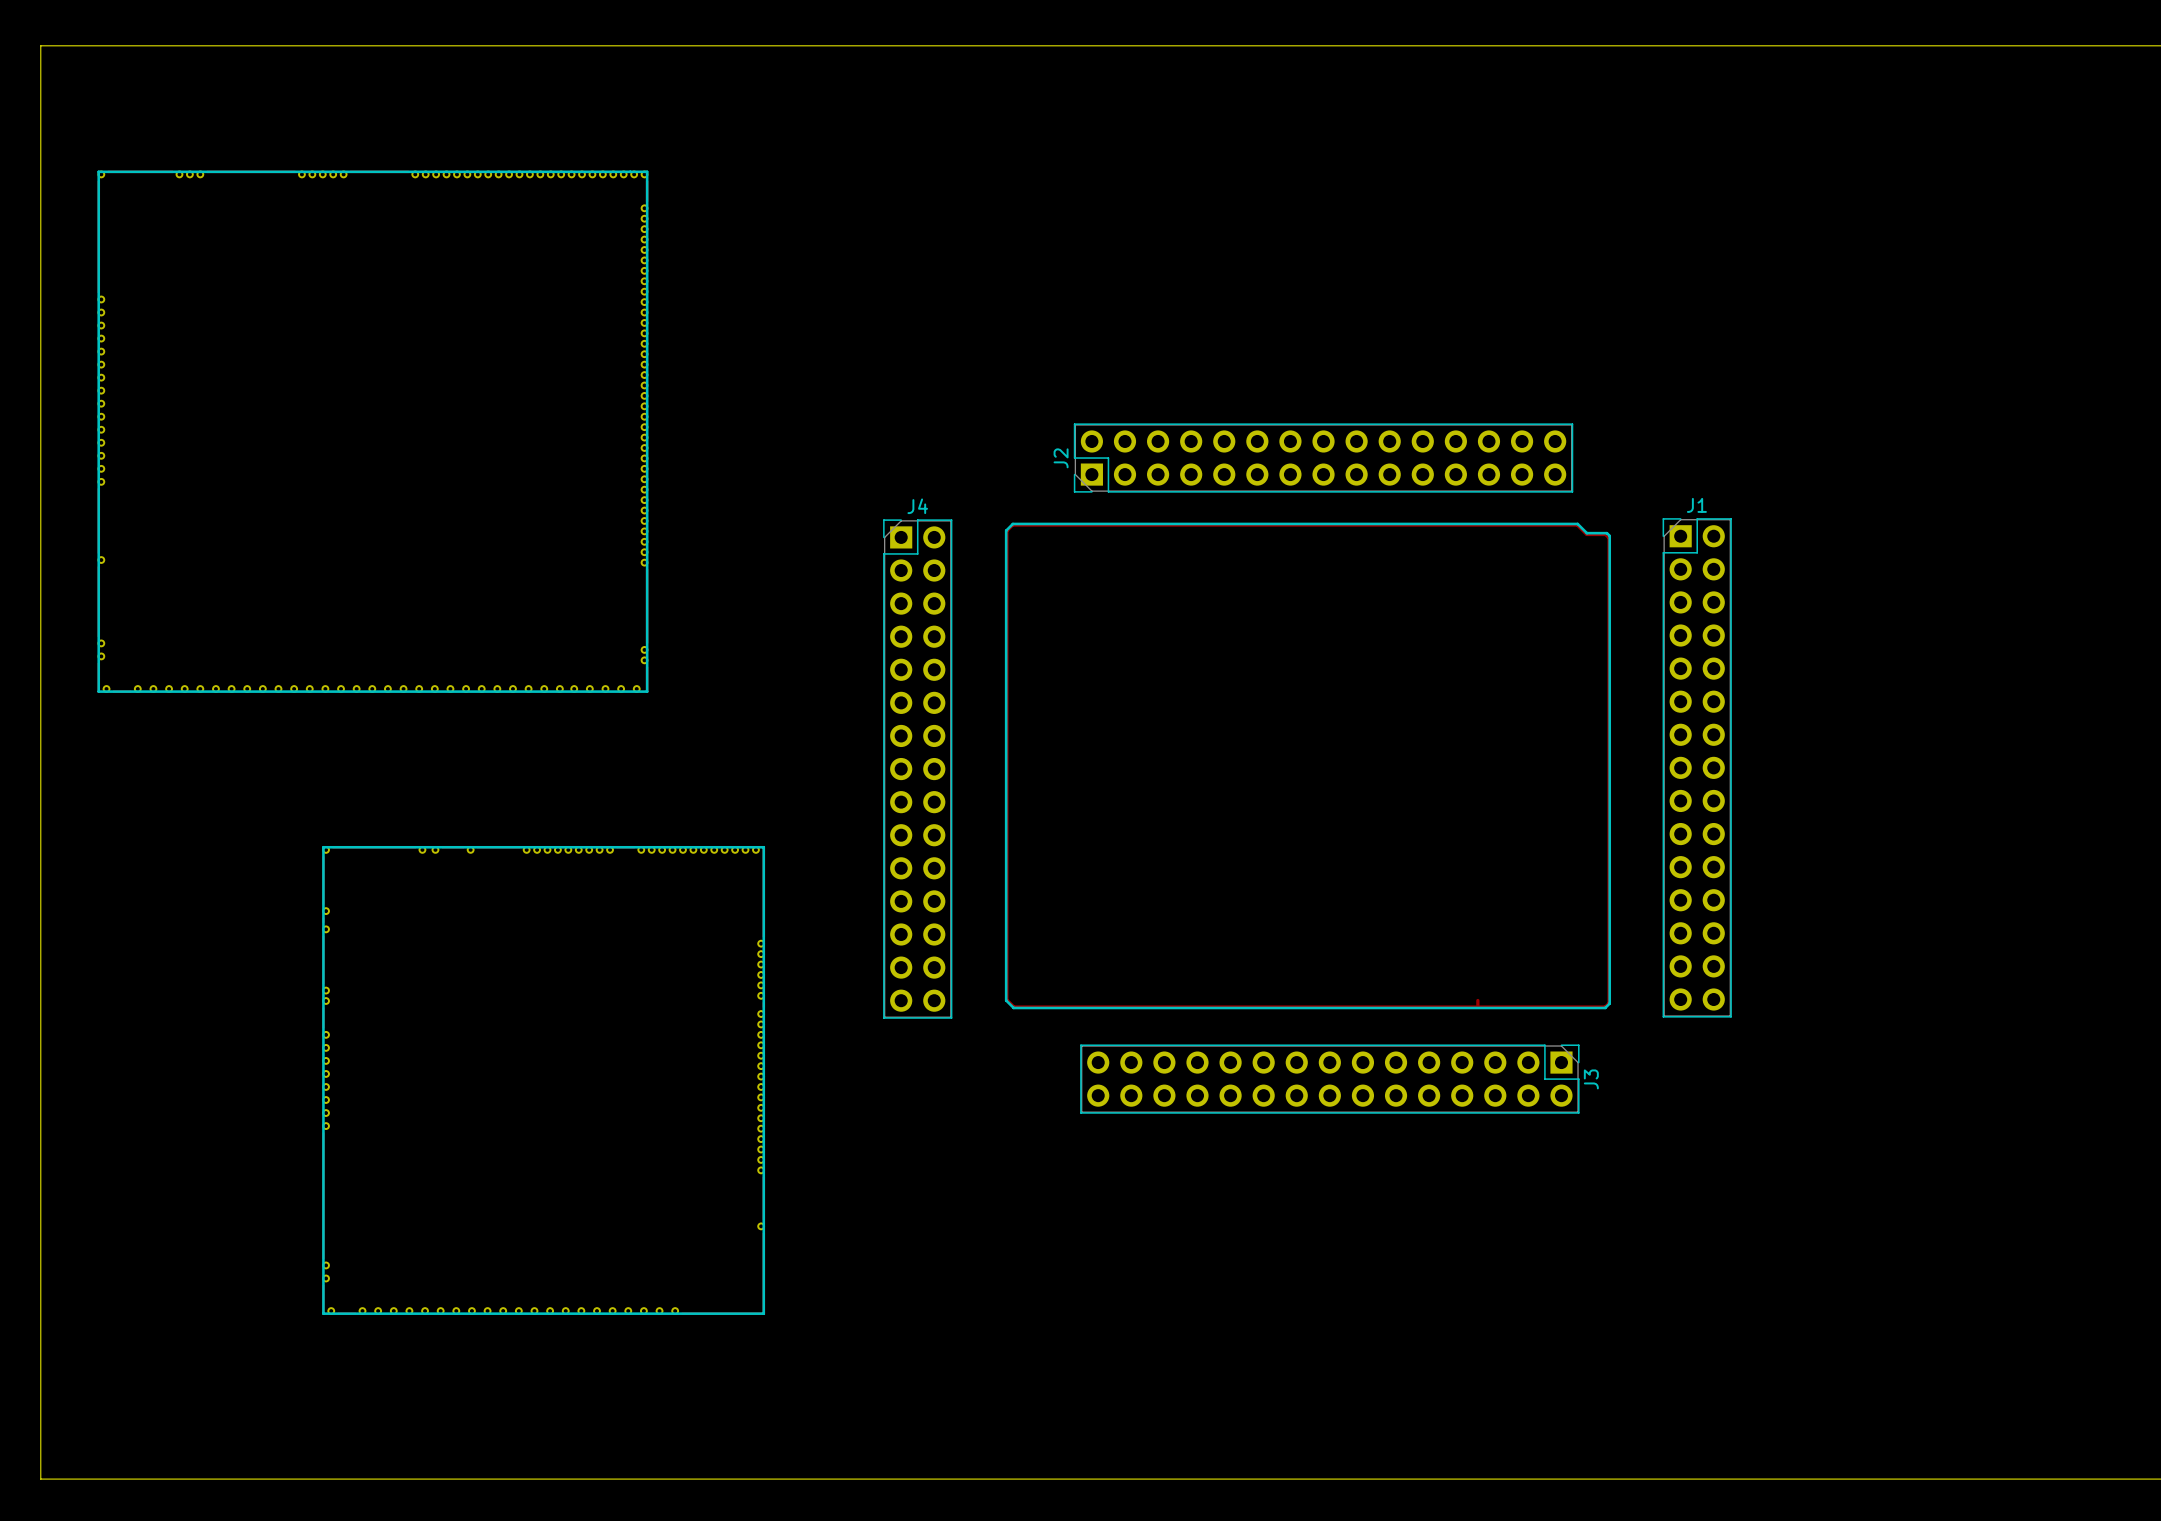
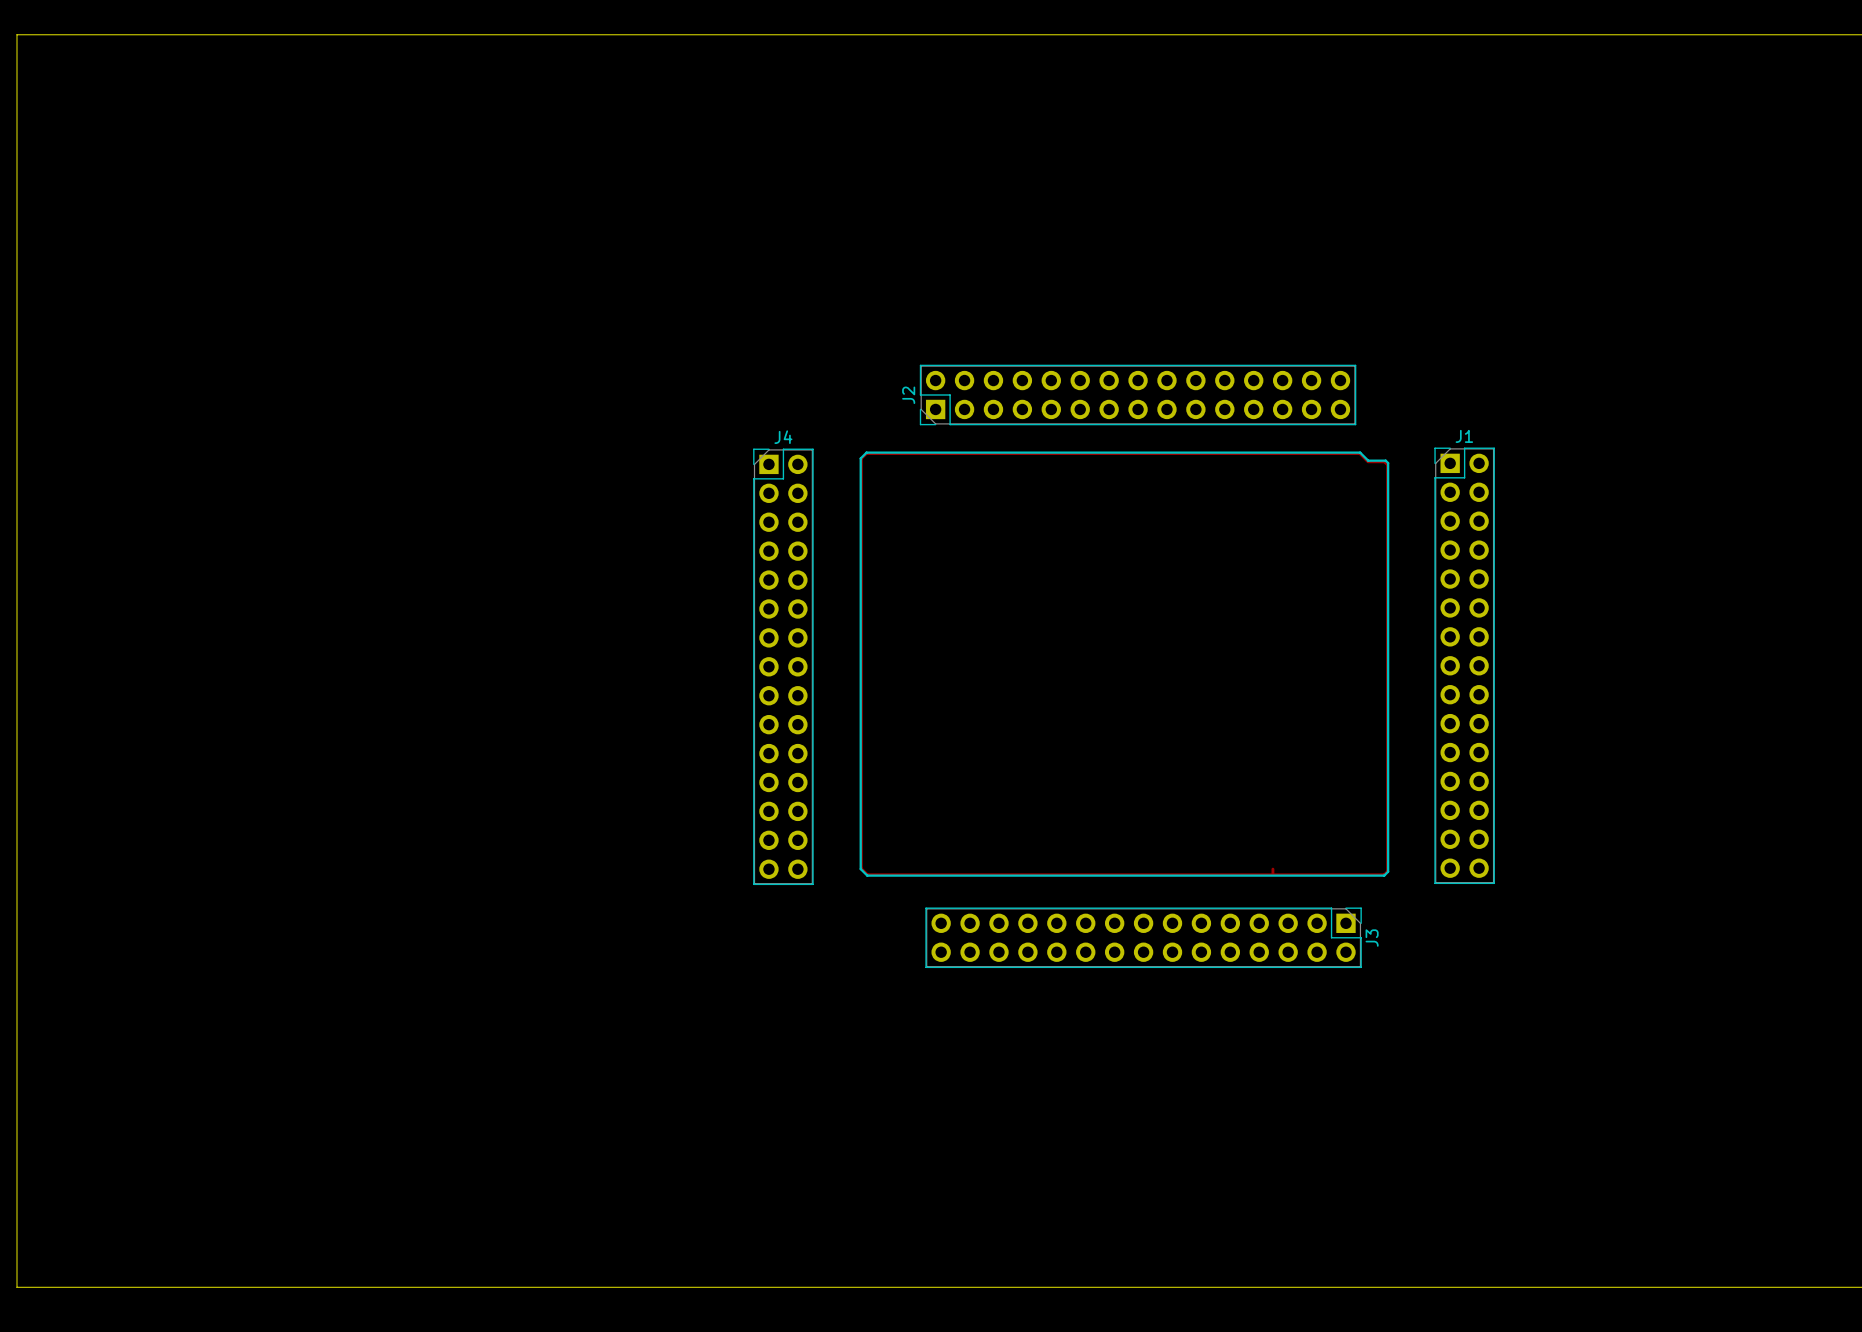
part: (372, 431) -> none
part: (543, 1080) -> none

